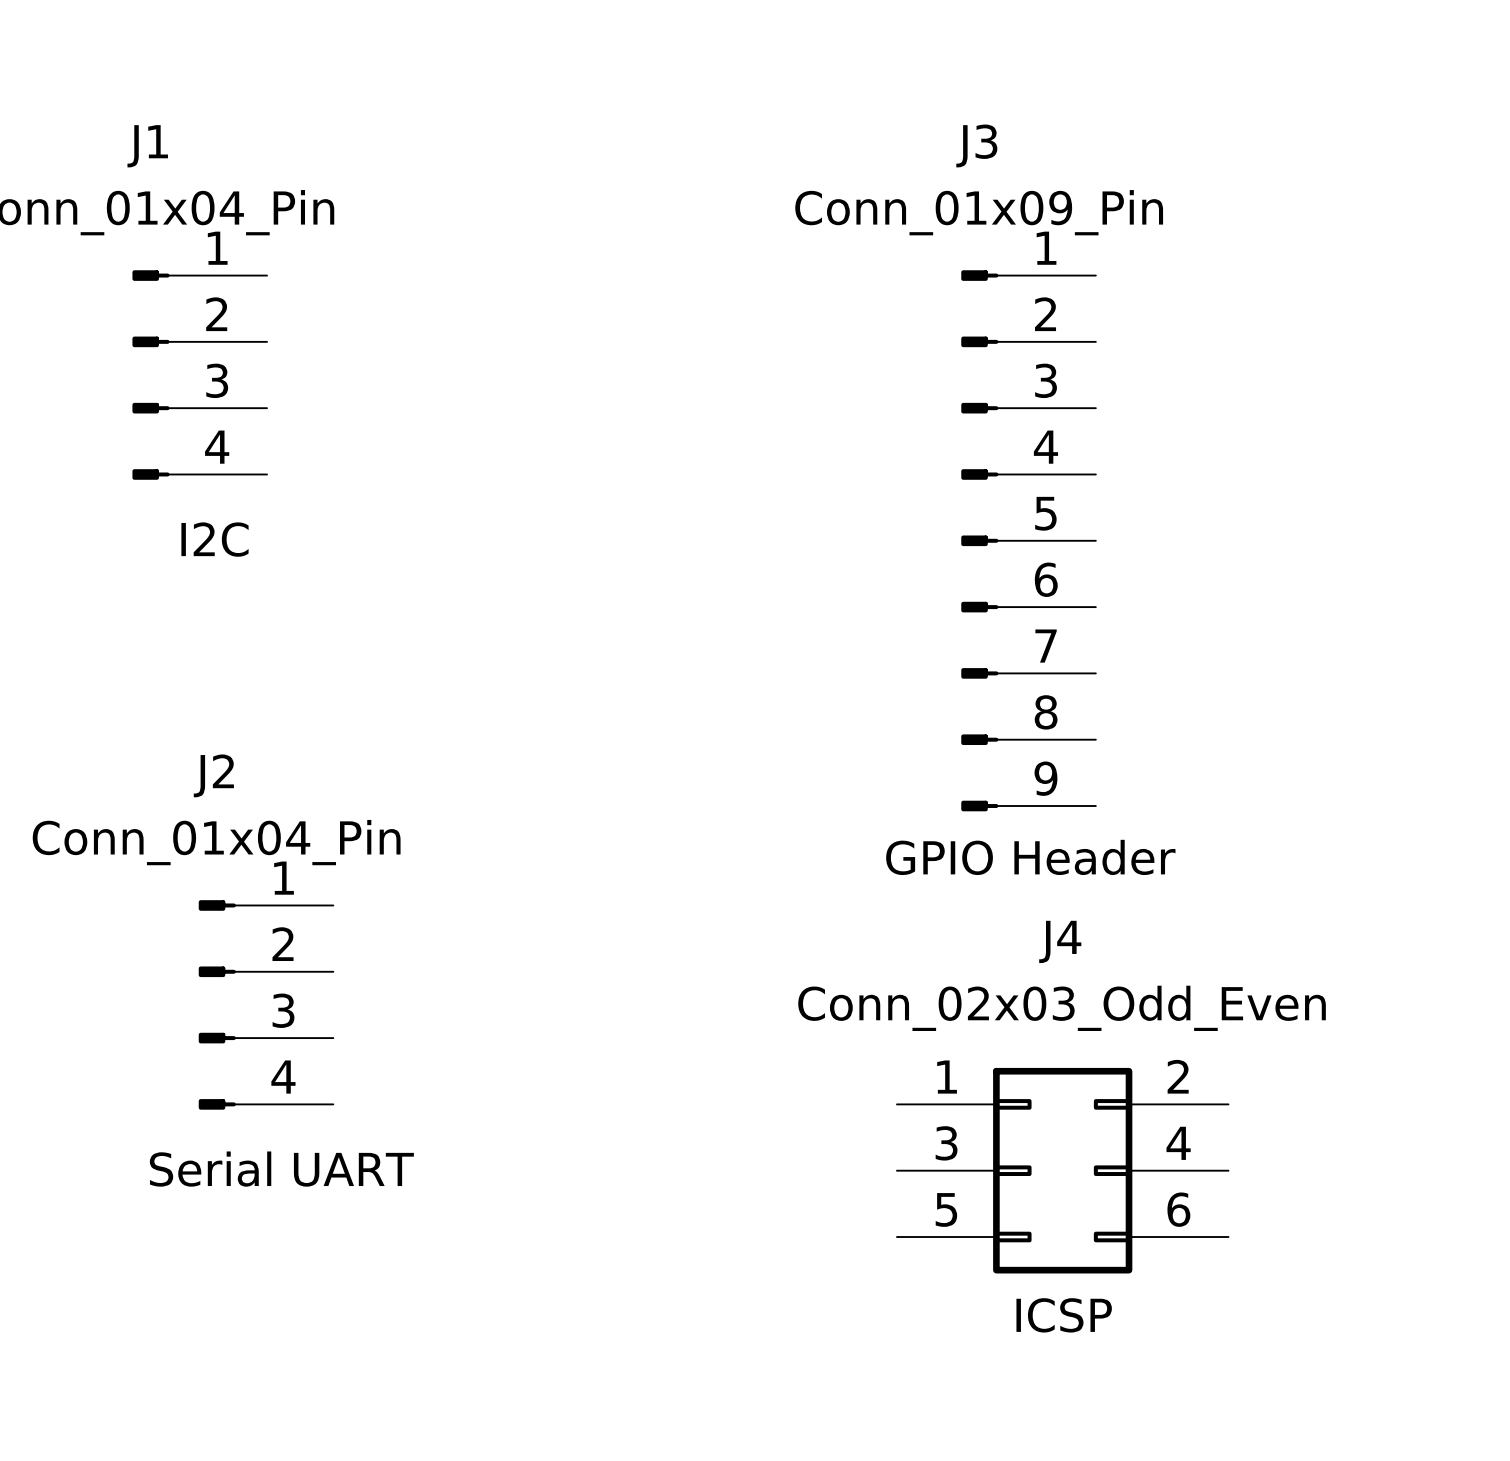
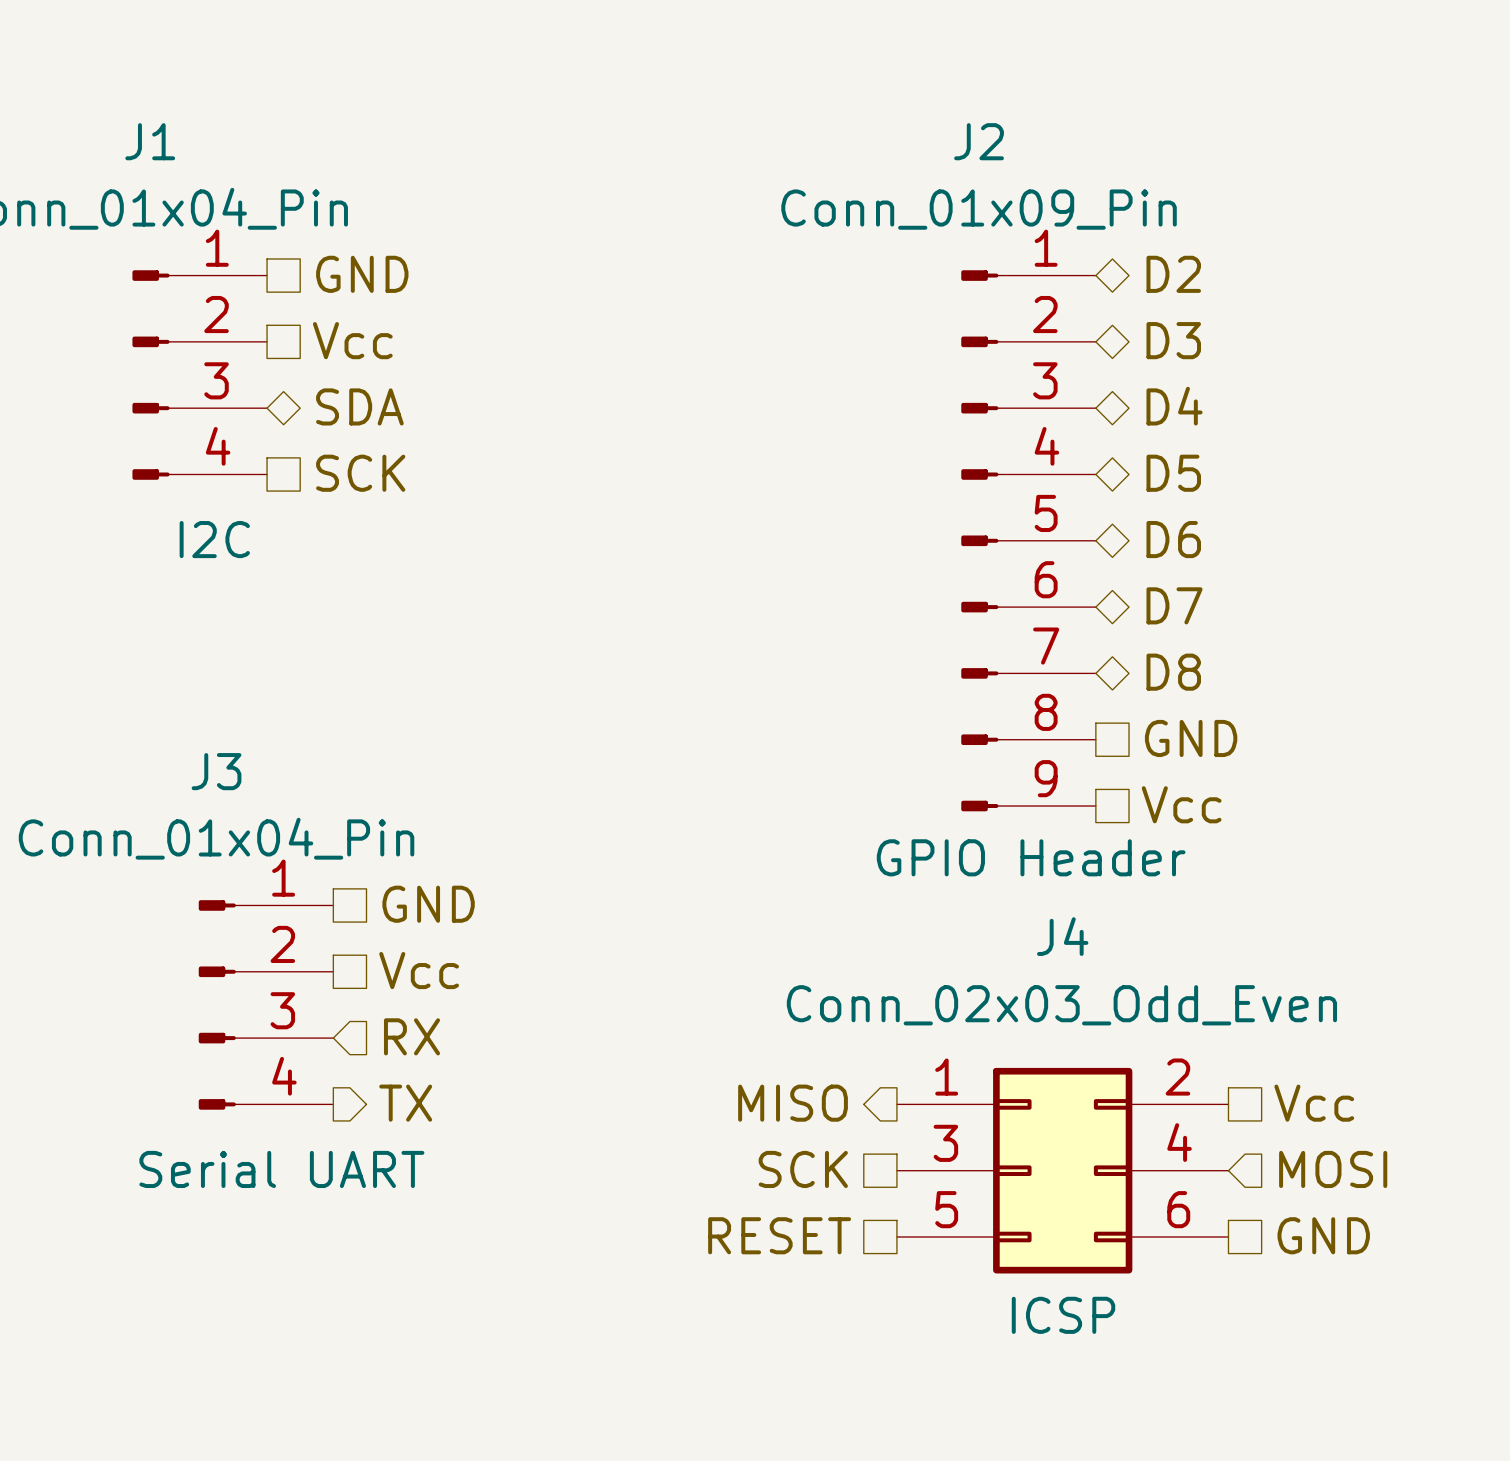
J3 name: J3 (976, 145) -> J2 (979, 141)
hierarchical label: none -> GND (362, 274)
hierarchical label: none -> D2 (1173, 274)
hierarchical label: none -> Vcc (352, 340)
hierarchical label: none -> D3 (1173, 340)
hierarchical label: none -> SDA (359, 406)
hierarchical label: none -> D4 (1174, 406)
hierarchical label: none -> SCK (360, 473)
hierarchical label: none -> D5 (1173, 473)
hierarchical label: none -> D6 (1173, 539)
hierarchical label: none -> D7 (1174, 605)
hierarchical label: none -> D8 (1173, 672)
hierarchical label: none -> GND (1191, 738)
J2 name: J2 (213, 775) -> J3 (216, 771)
hierarchical label: none -> Vcc (1181, 804)
hierarchical label: none -> GND (428, 904)
hierarchical label: none -> Vcc (419, 970)
hierarchical label: none -> RX (412, 1036)
hierarchical label: none -> TX (405, 1103)
hierarchical label: none -> MISO (793, 1103)
hierarchical label: none -> Vcc (1314, 1103)
hierarchical label: none -> SCK (803, 1169)
hierarchical label: none -> MOSI (1333, 1169)
hierarchical label: none -> RESET (779, 1235)
hierarchical label: none -> GND (1323, 1235)

